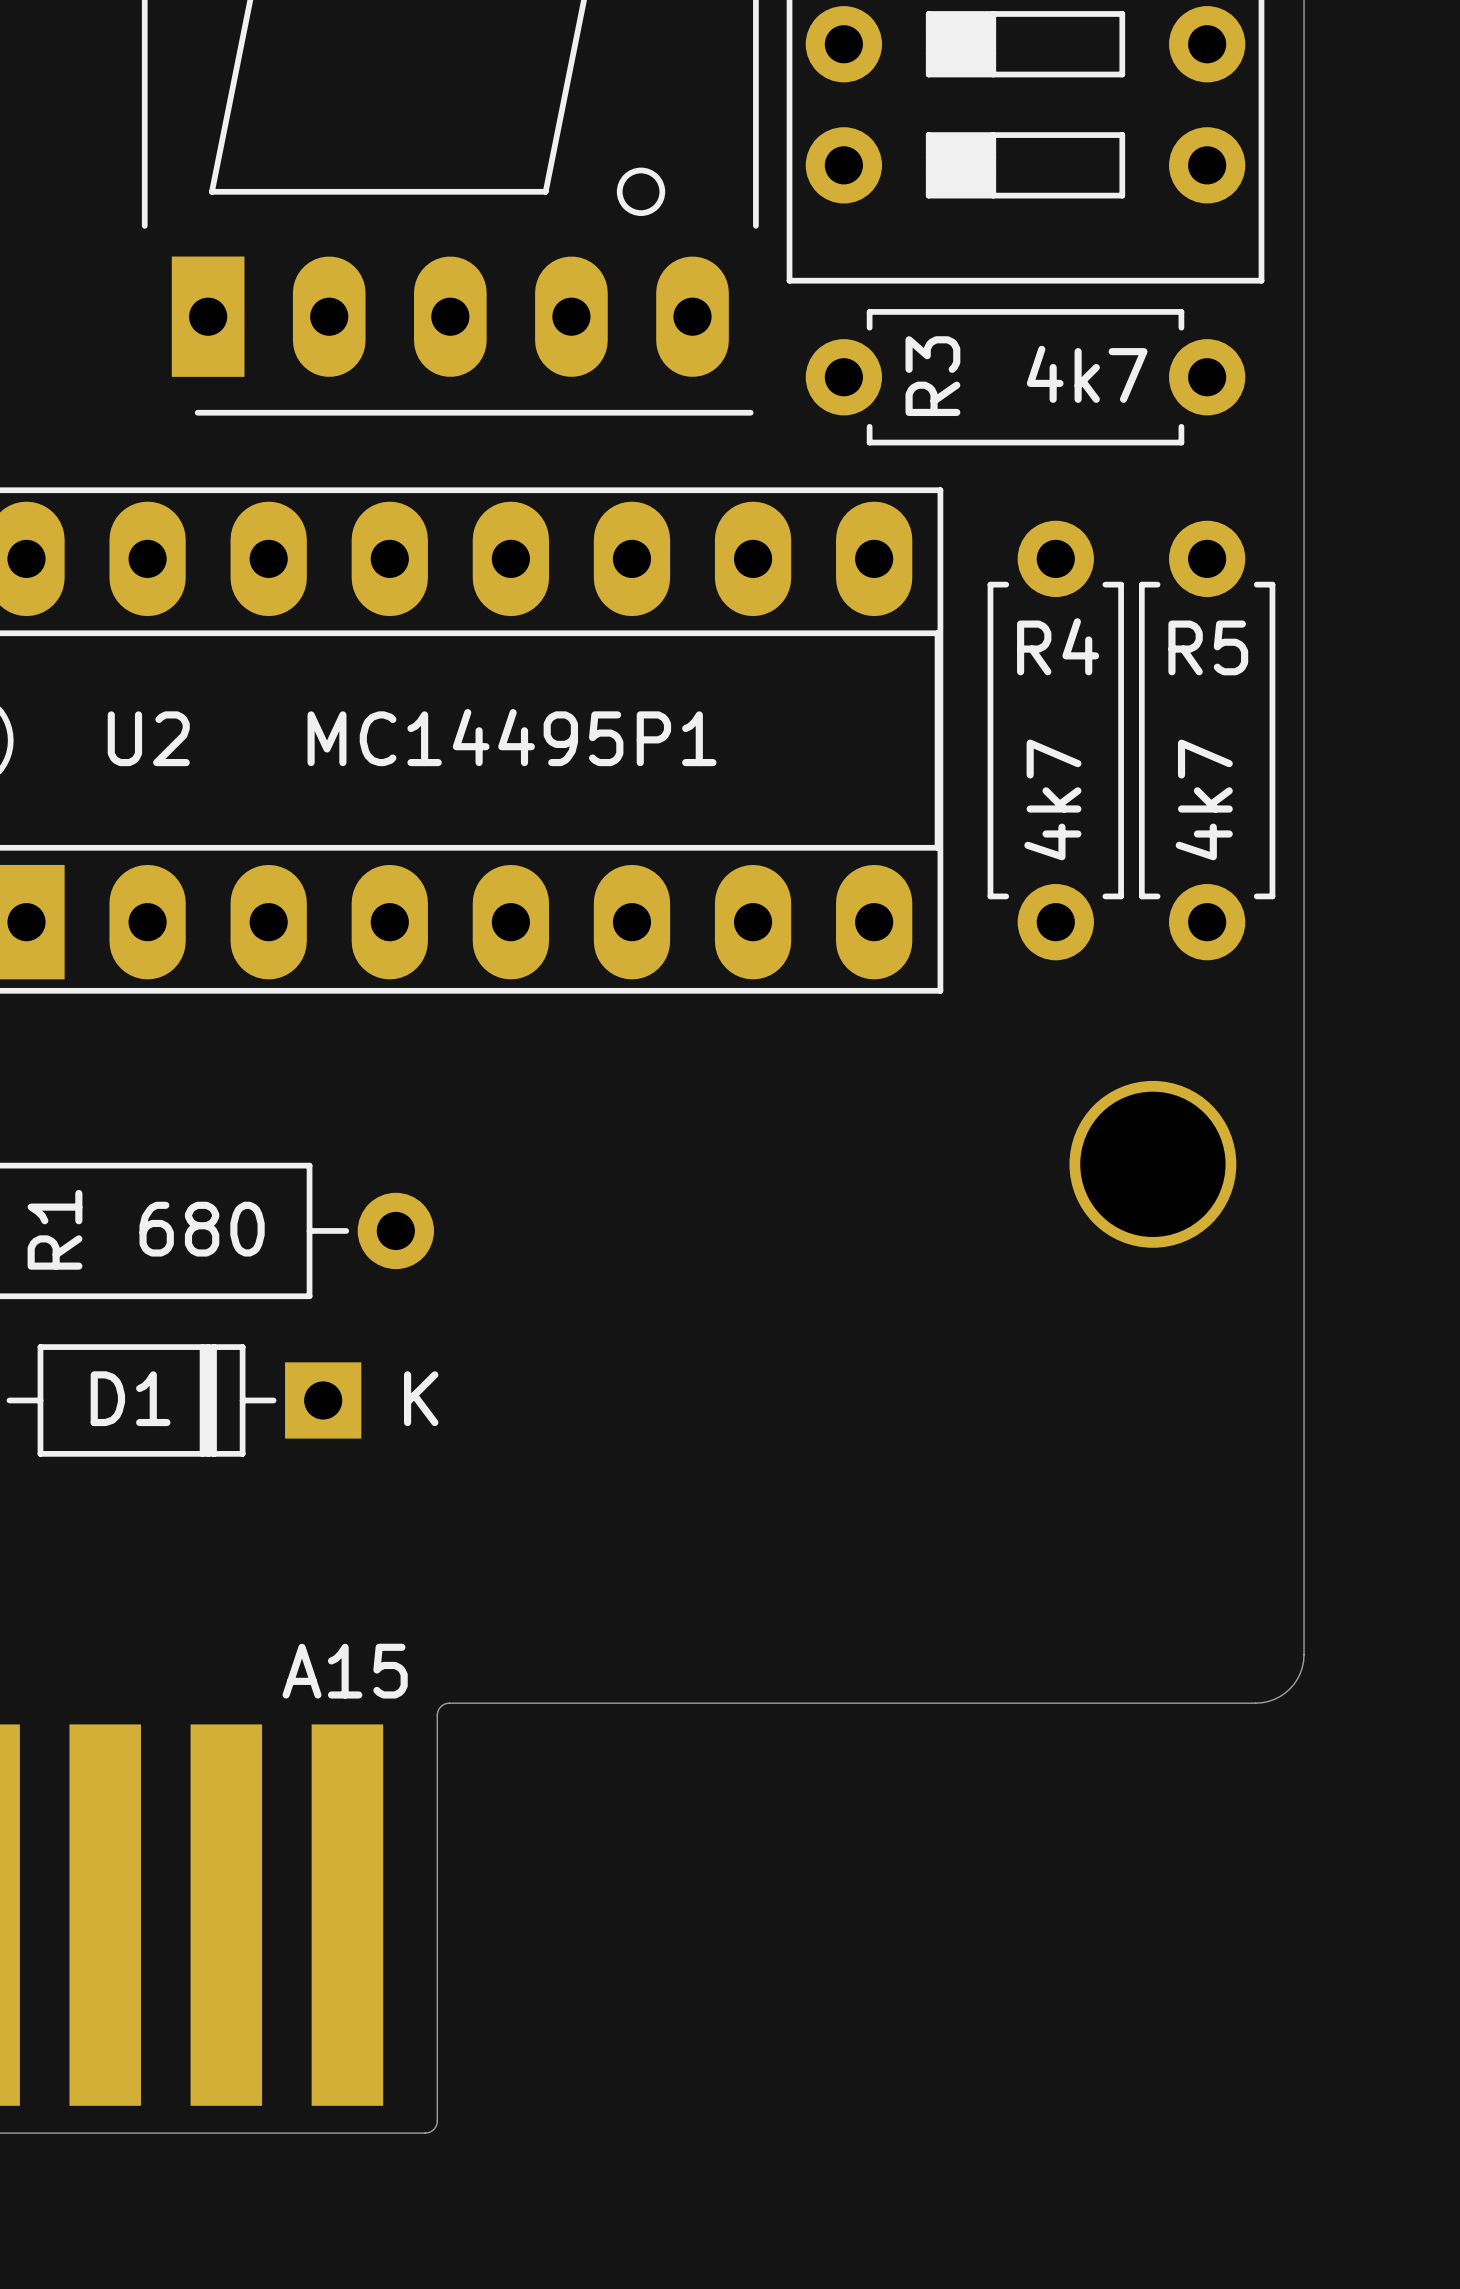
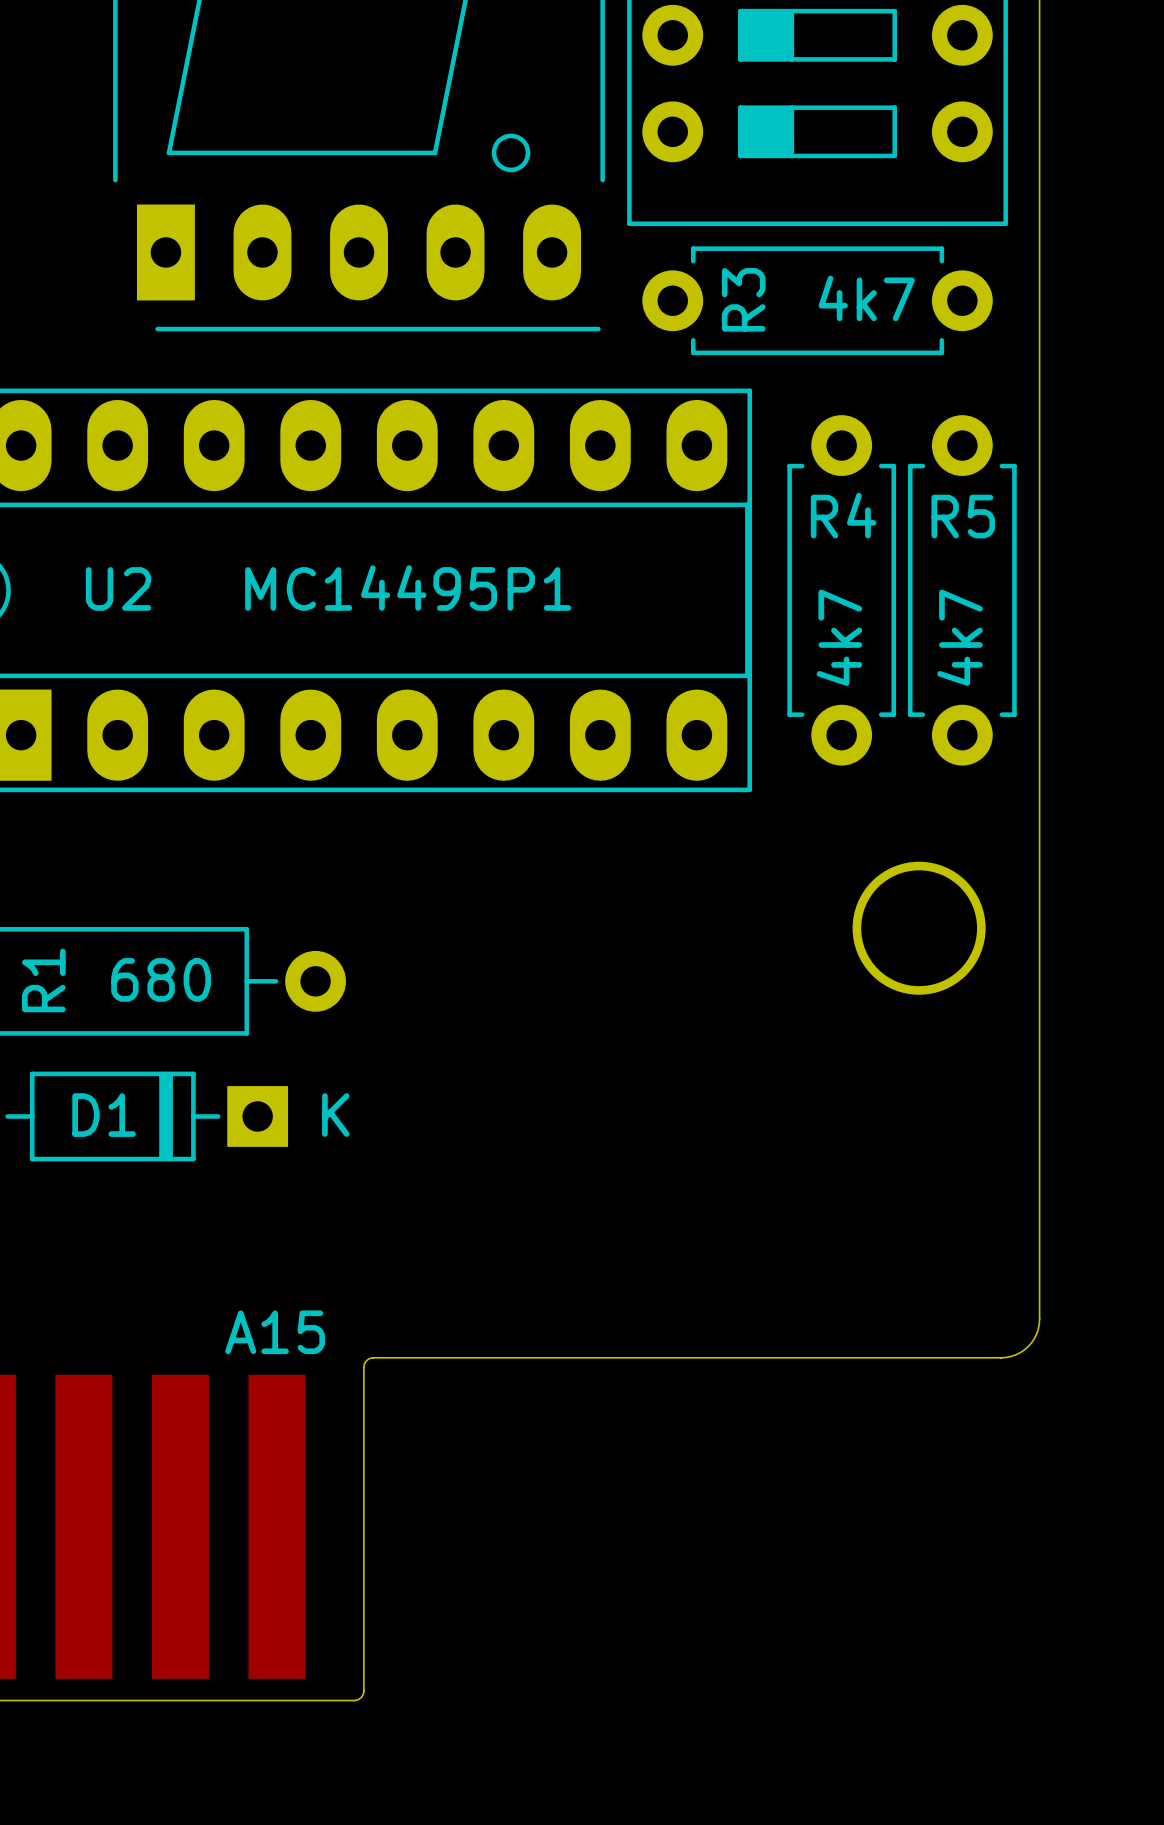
board edge: (468, 1703) (446, 1703) (440, 1706) (437, 1713) (437, 2120) (433, 2129) (425, 2133) -> (373, 1357) (366, 1360) (363, 1367) (363, 1692) (361, 1697) (356, 1700) (338, 1700)

